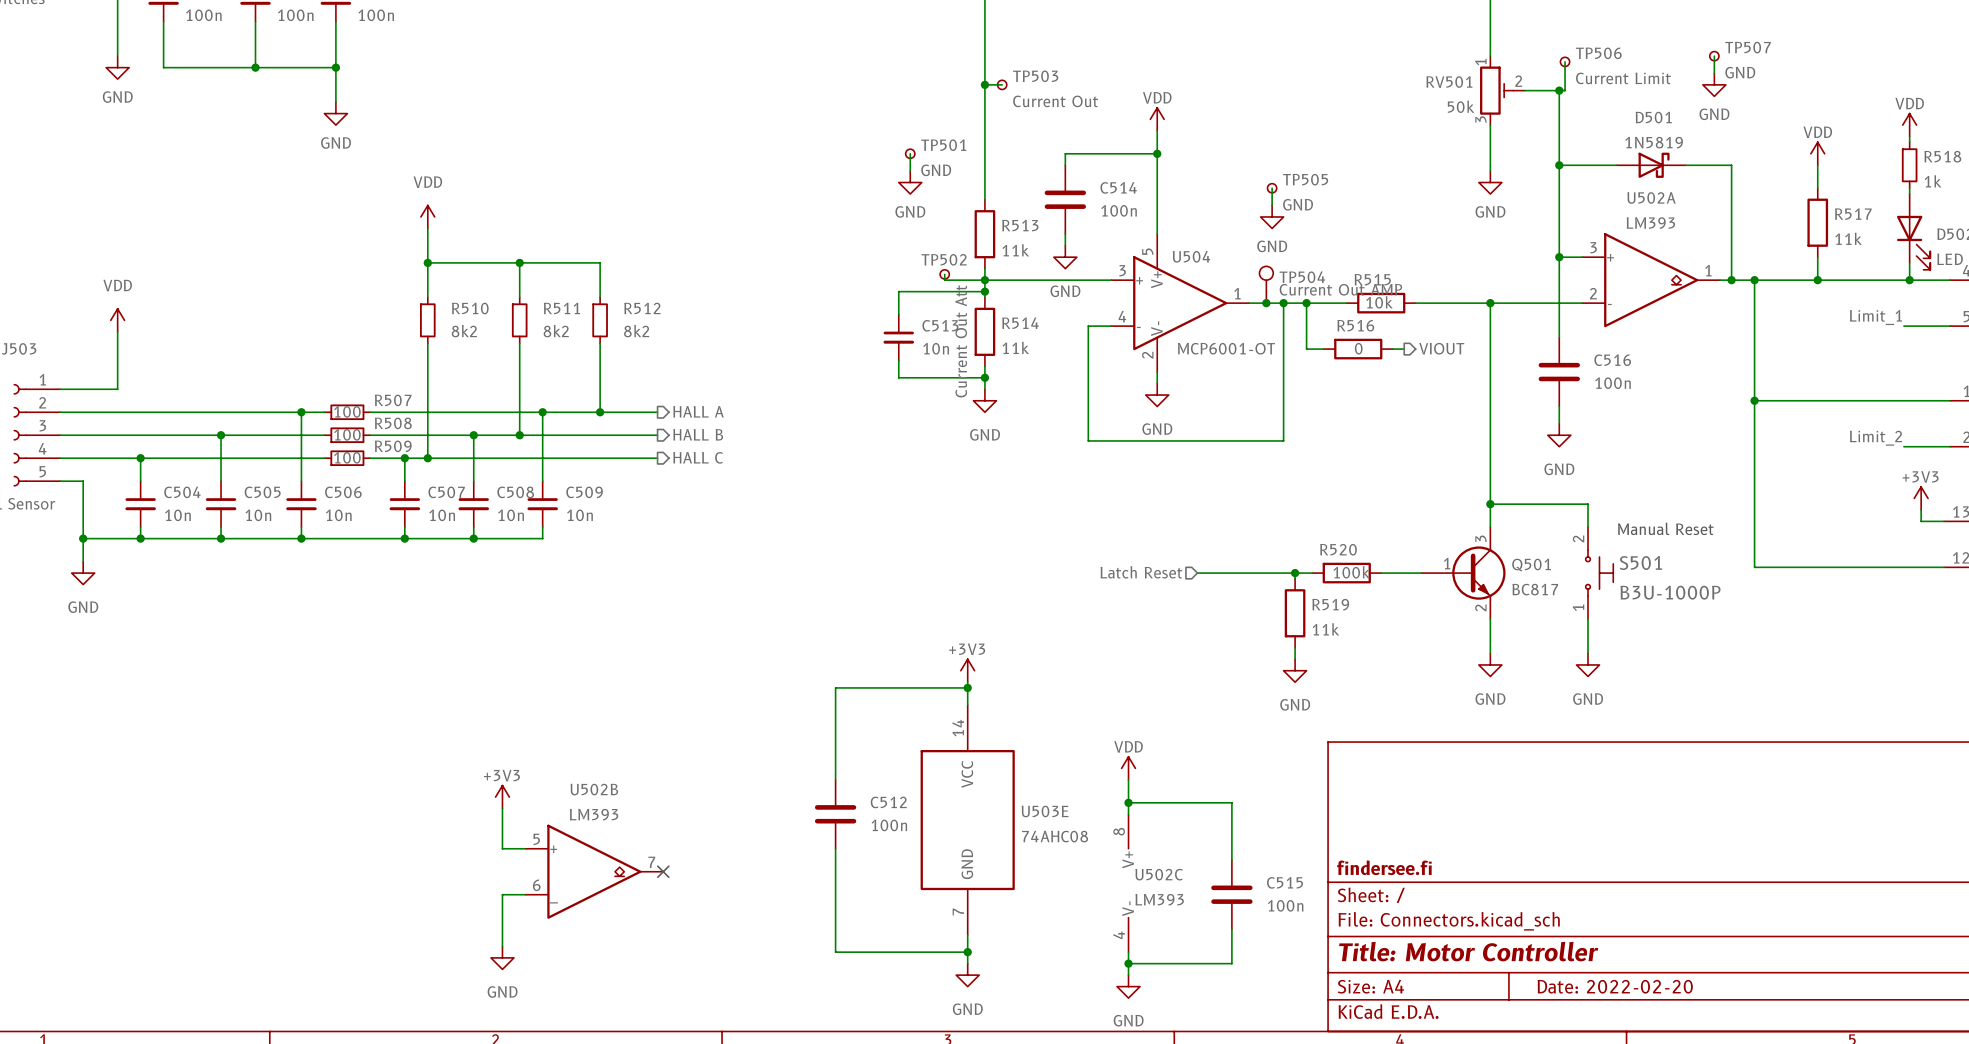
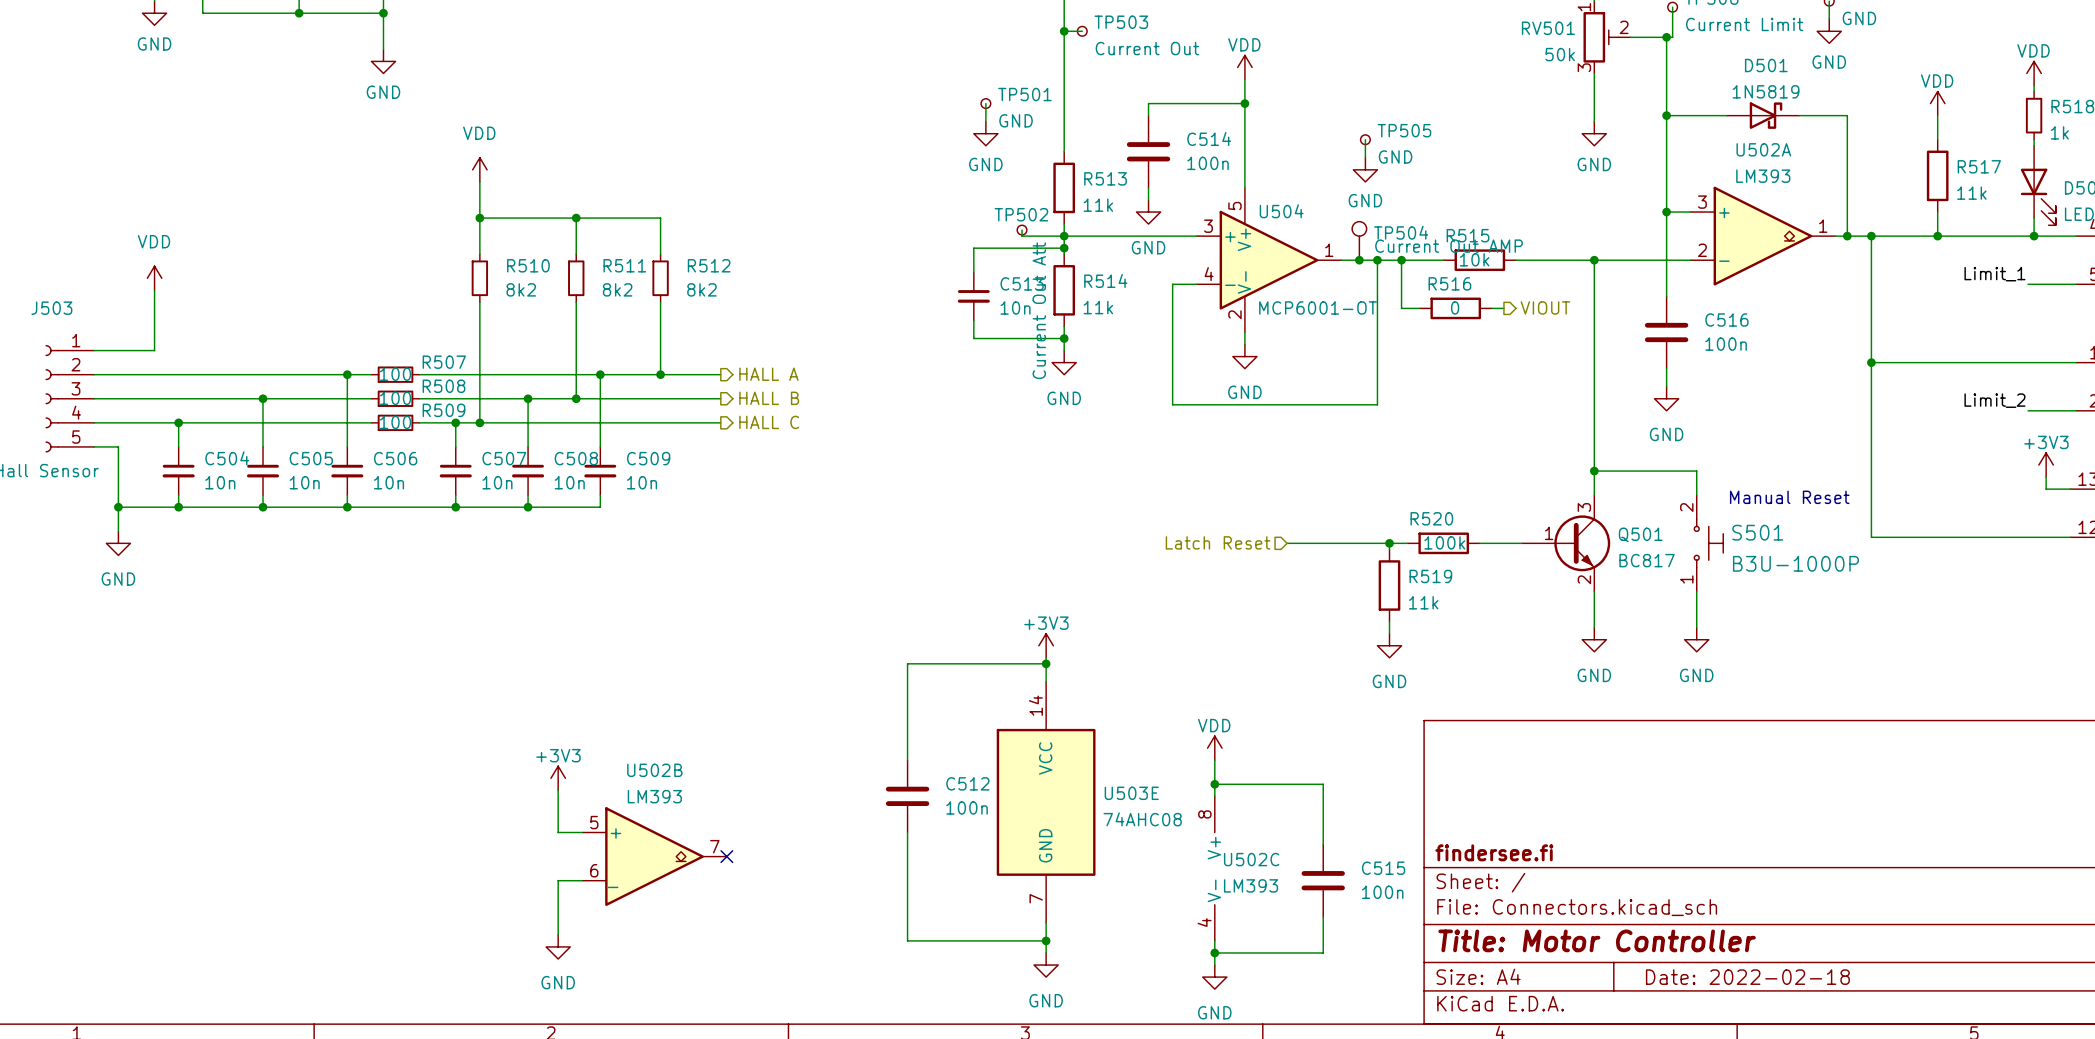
title block: Date: 2022-02-20 (1615, 986) -> Date: 2022-02-18 (1747, 977)

